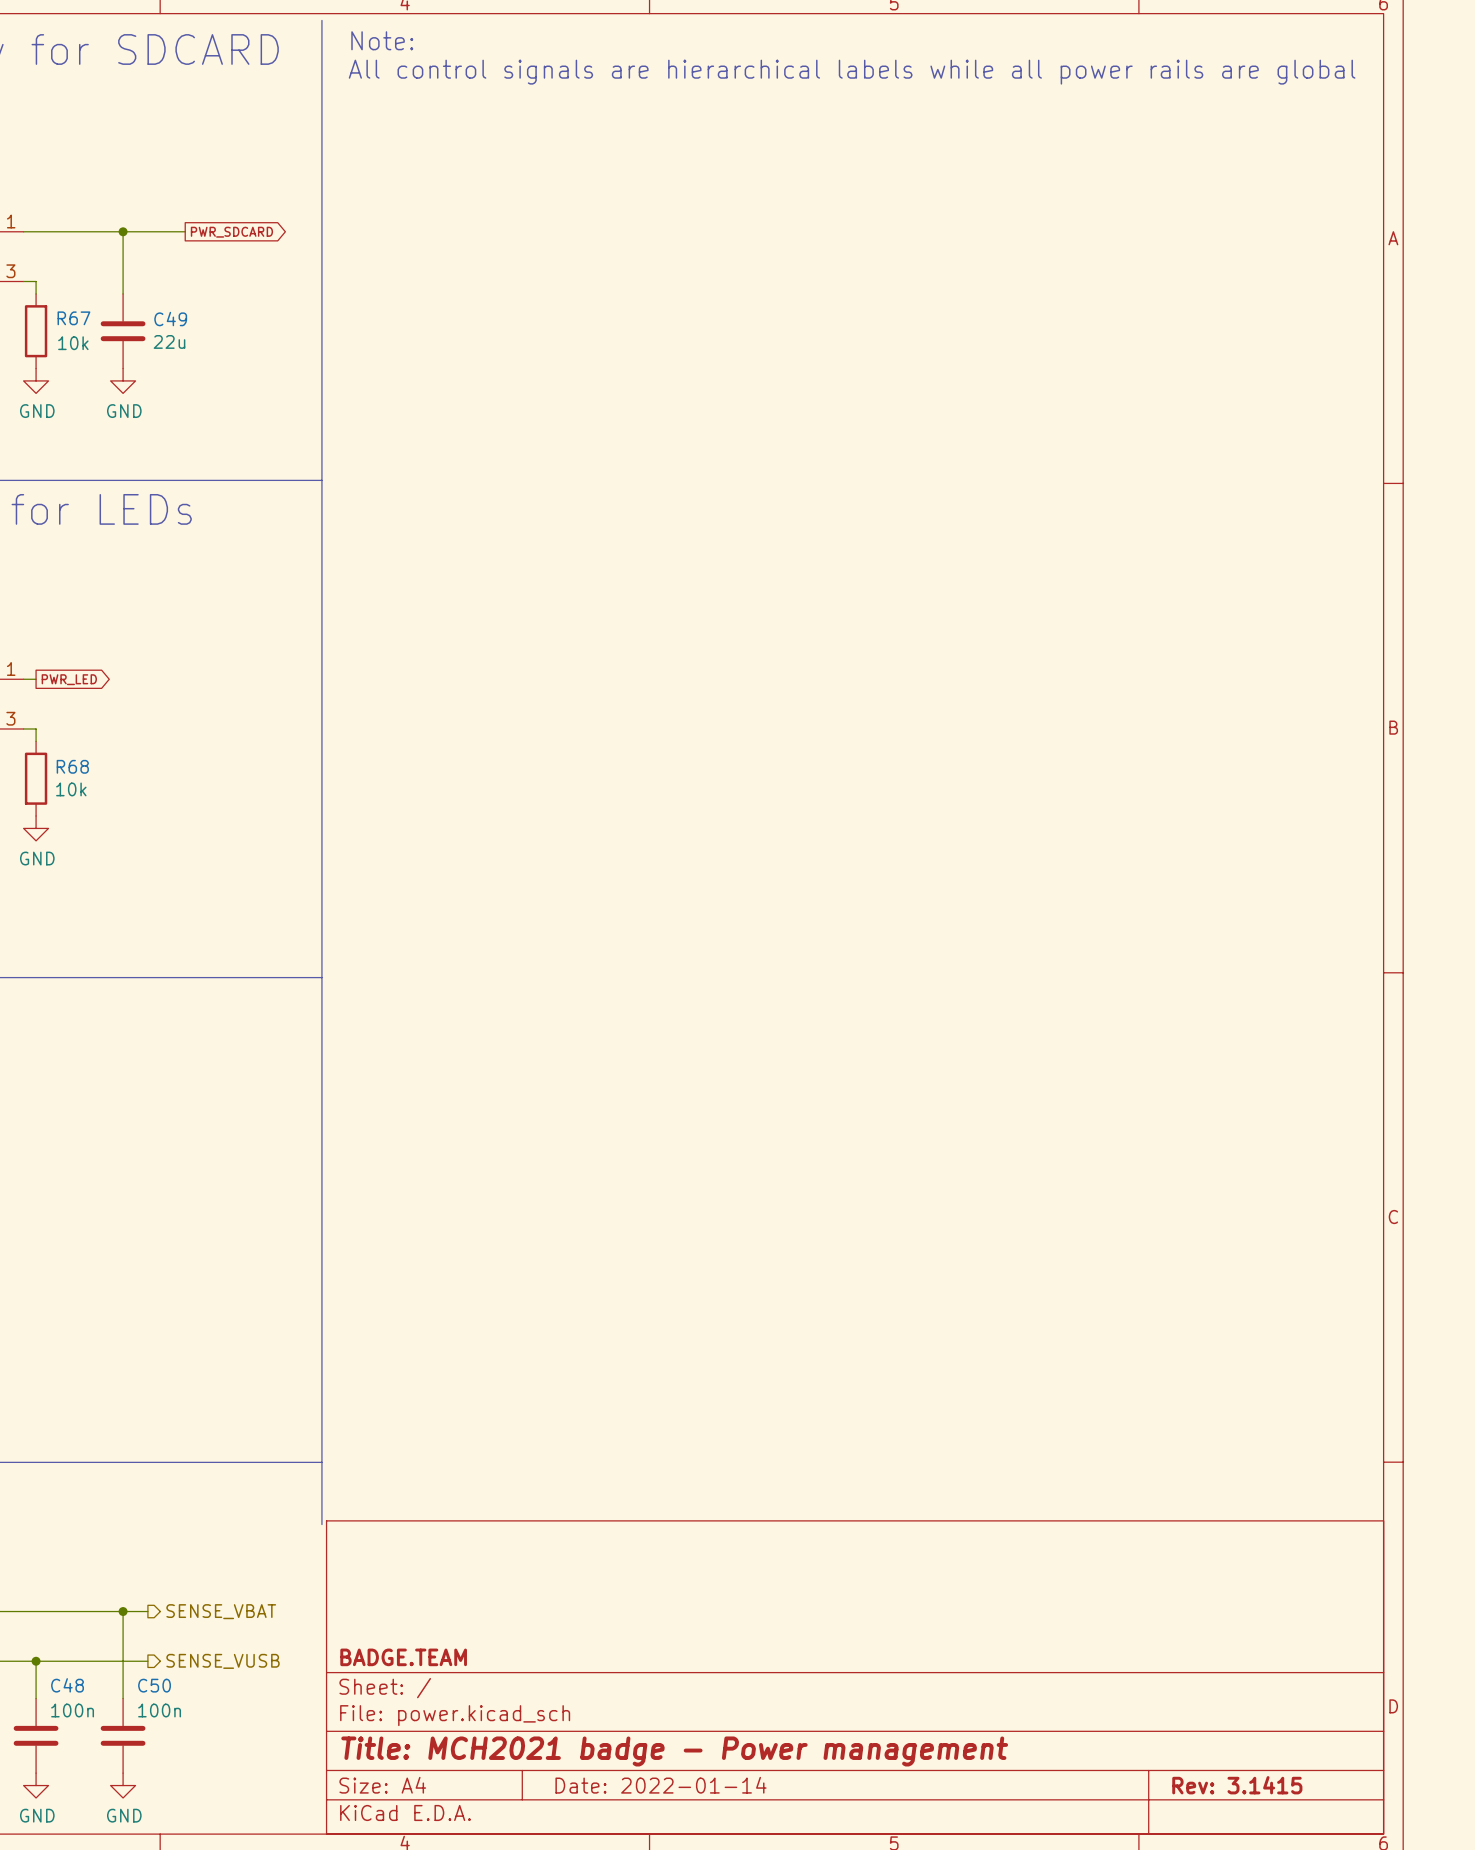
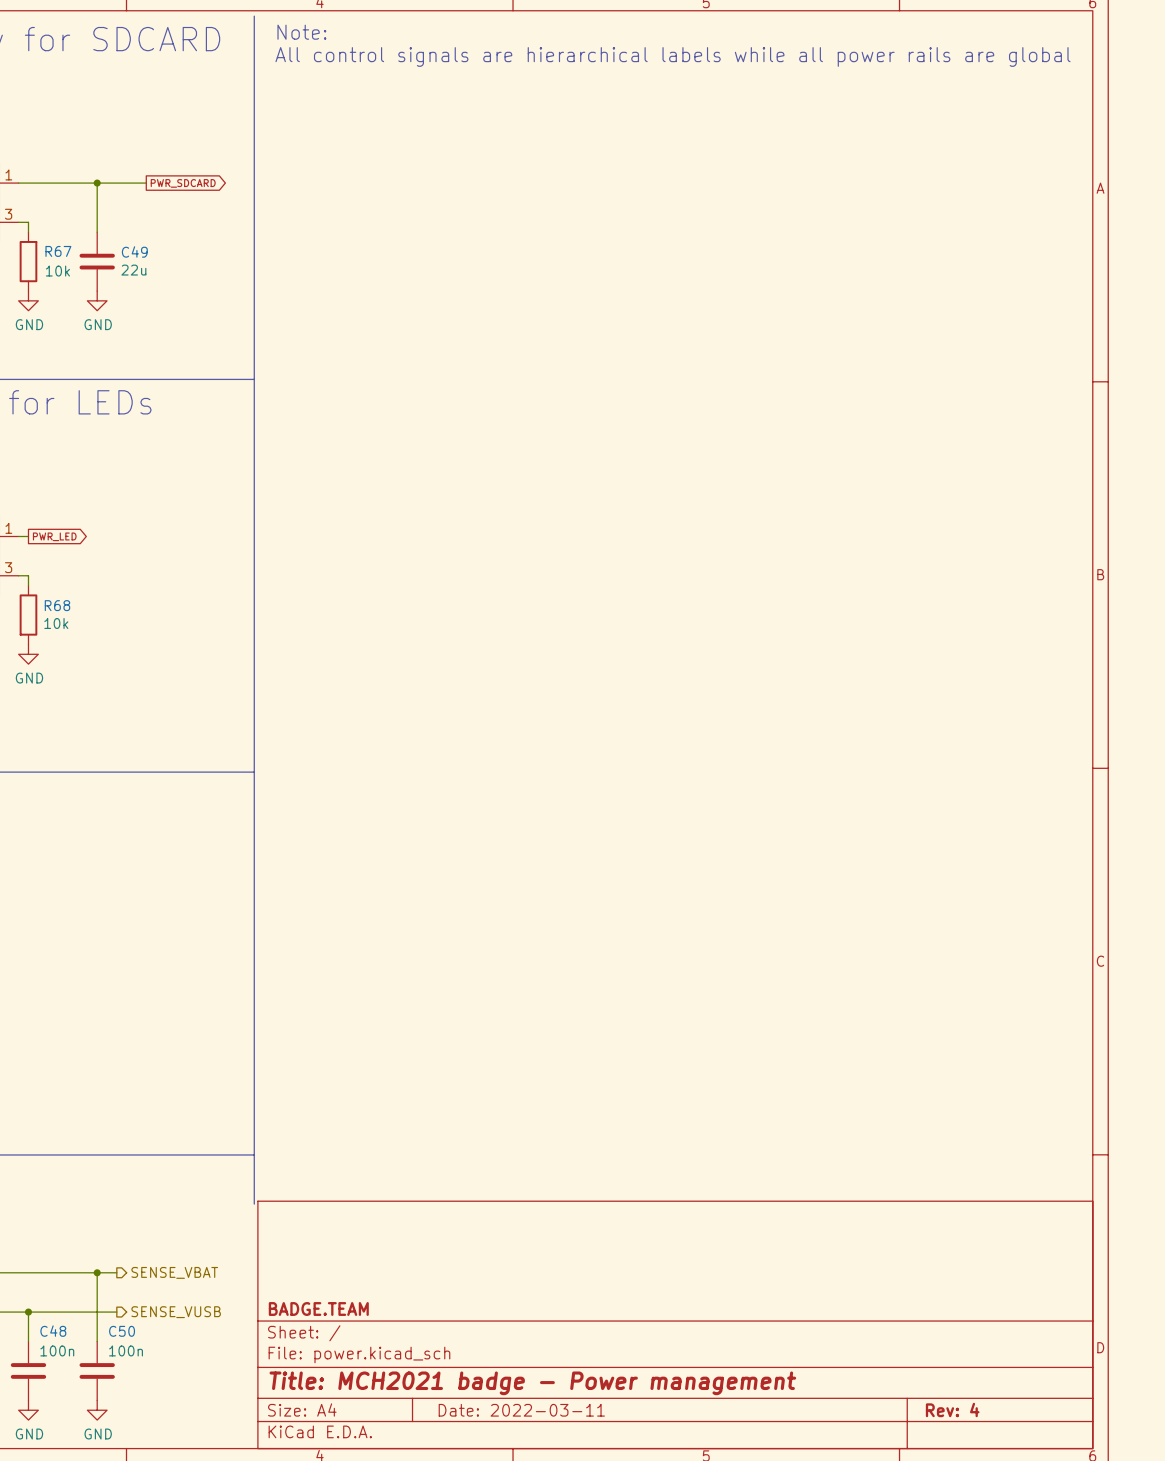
title block: Date: 2022-01-14 (661, 1785) -> Date: 2022-03-11 (521, 1410)
title block: Rev: 3.1415 (1237, 1785) -> Rev: 4 (952, 1409)

